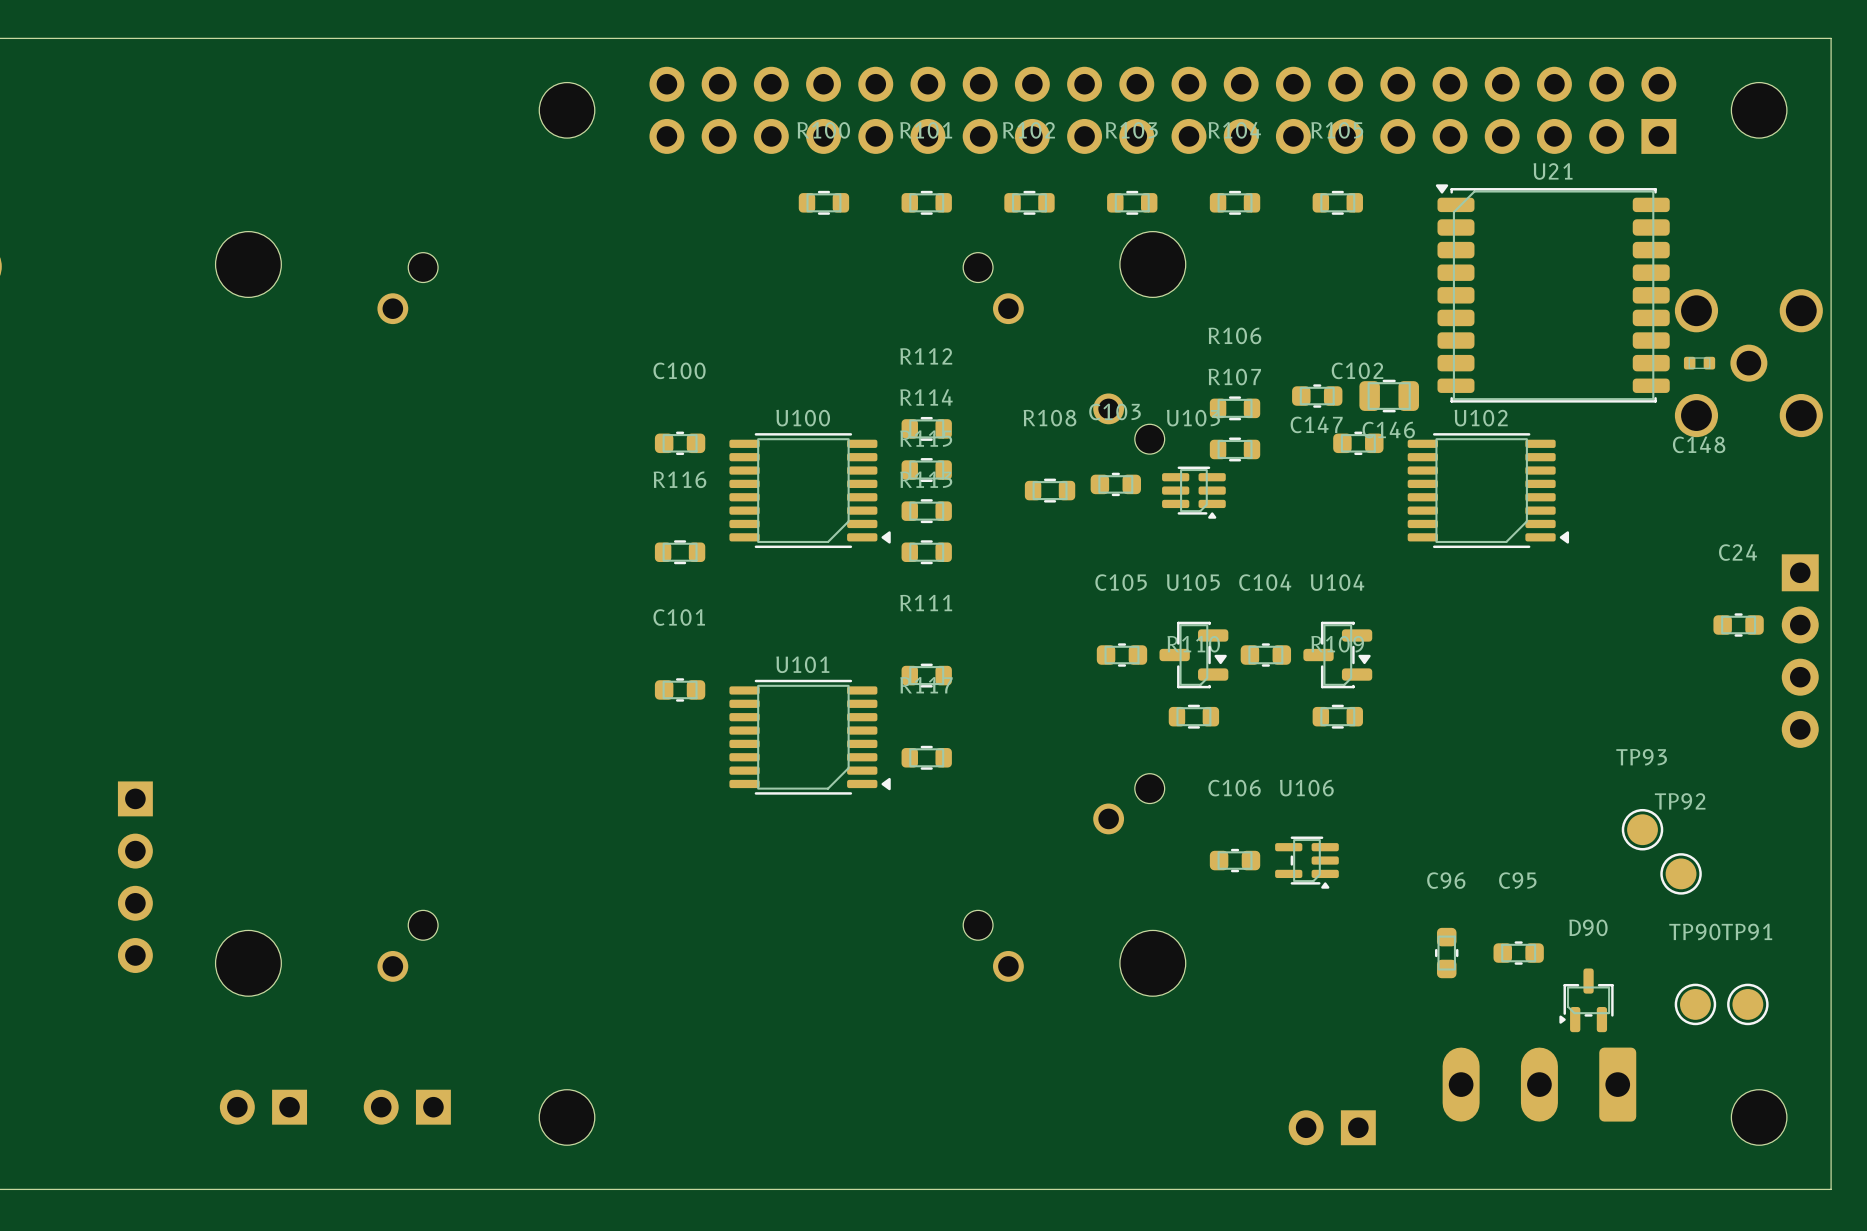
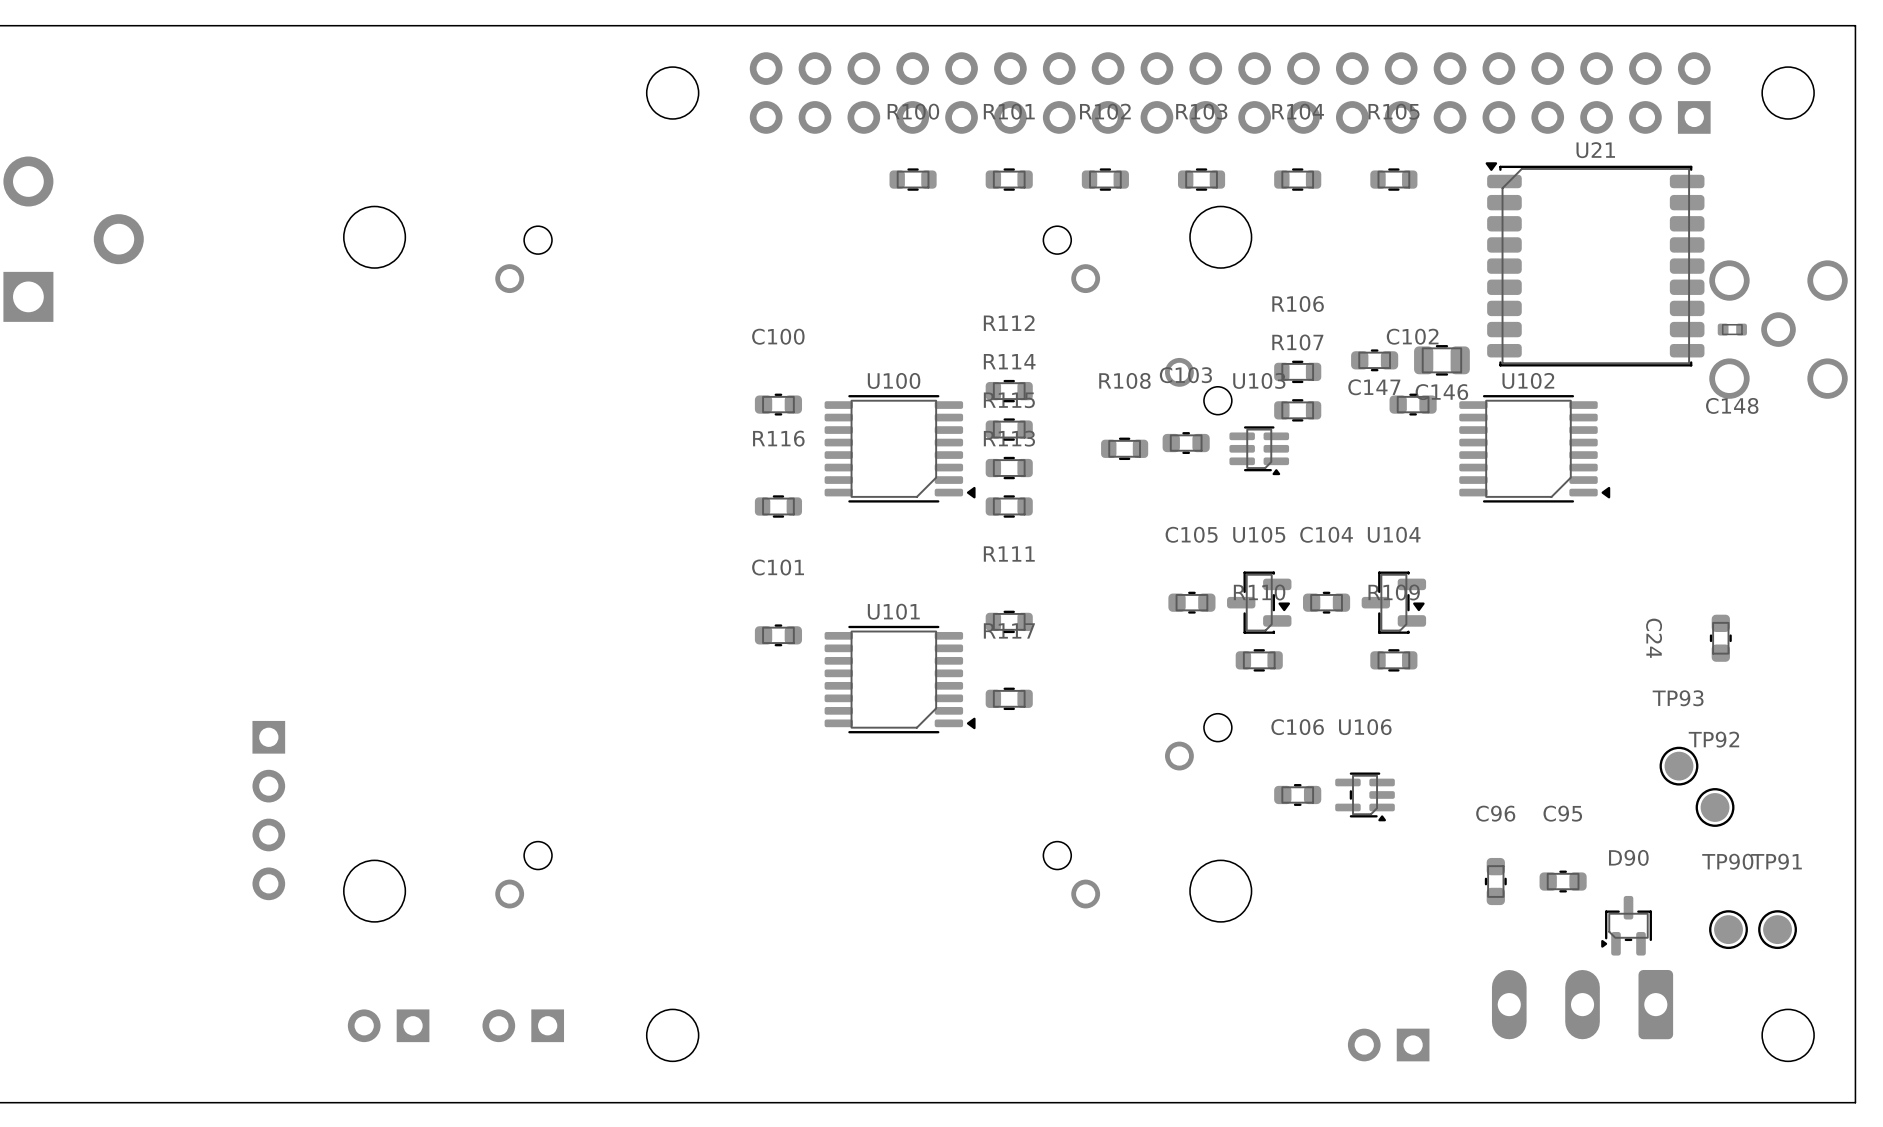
C24 name position: C24 (1738, 552) -> C24 (1654, 638)
C24 rotation: 0° (1738, 625) -> 90° clockwise (1720, 638)
C24 position: (1738, 625) -> (1720, 638)
part: (1800, 651) -> none

